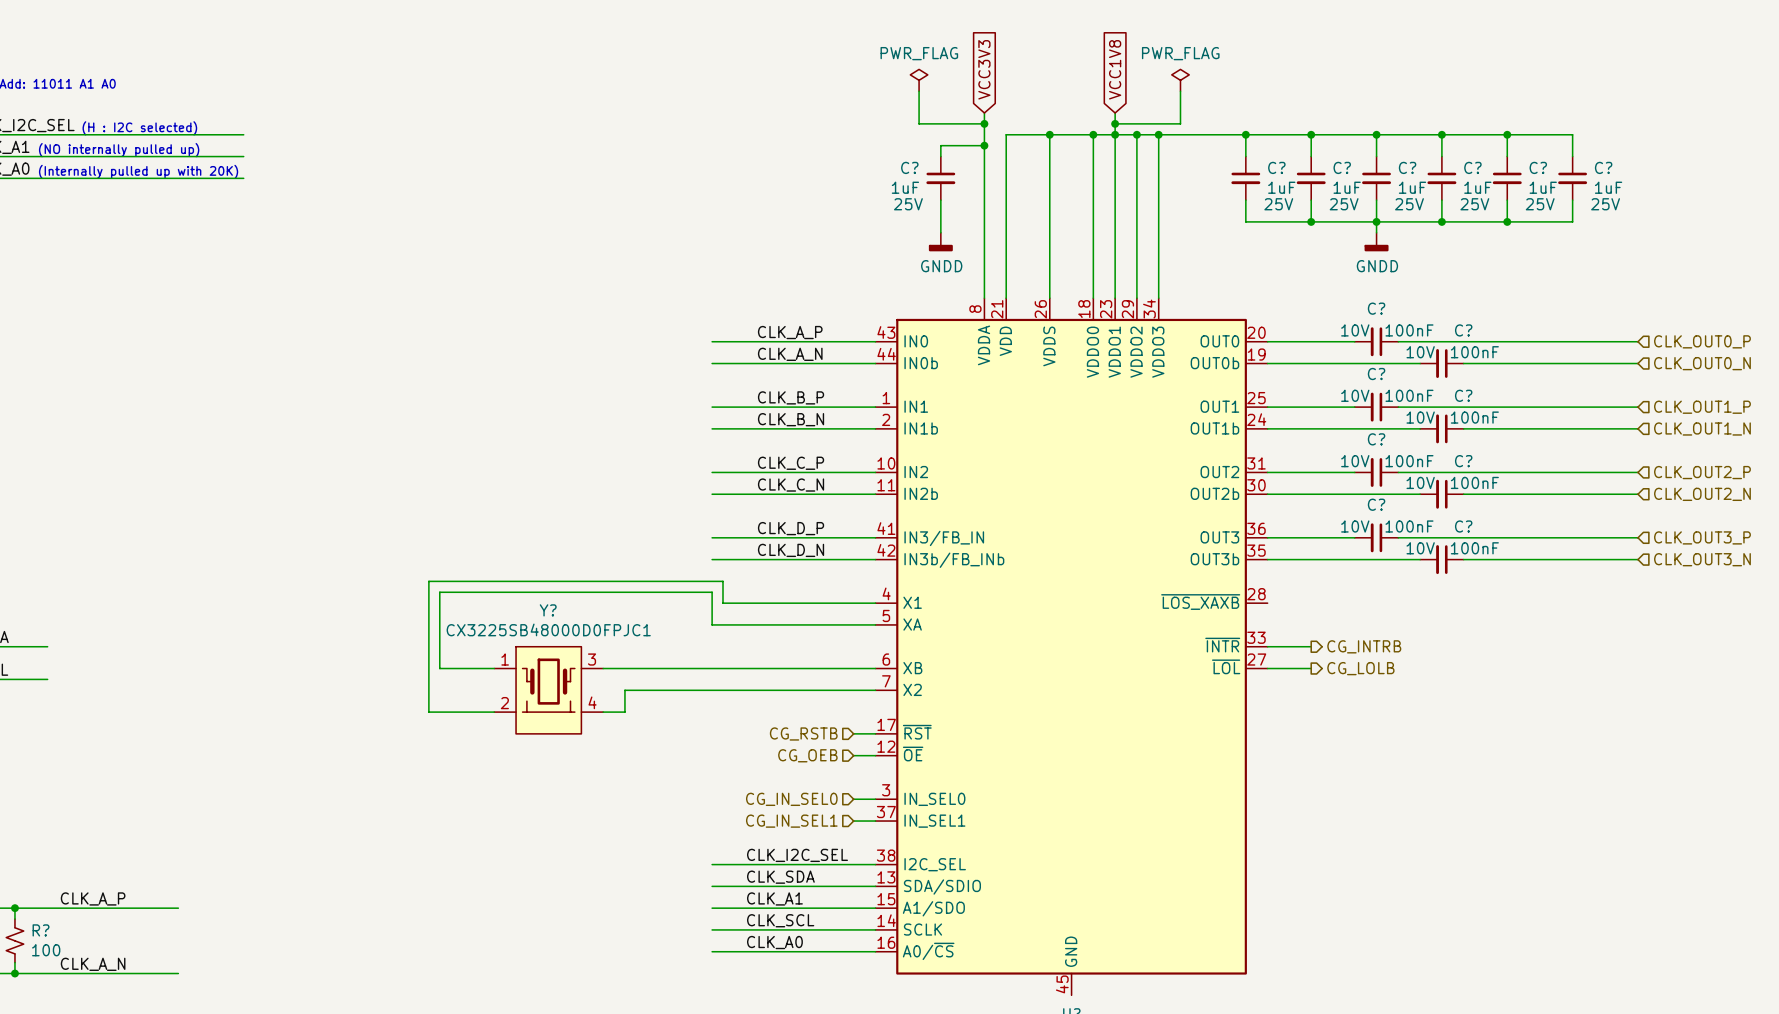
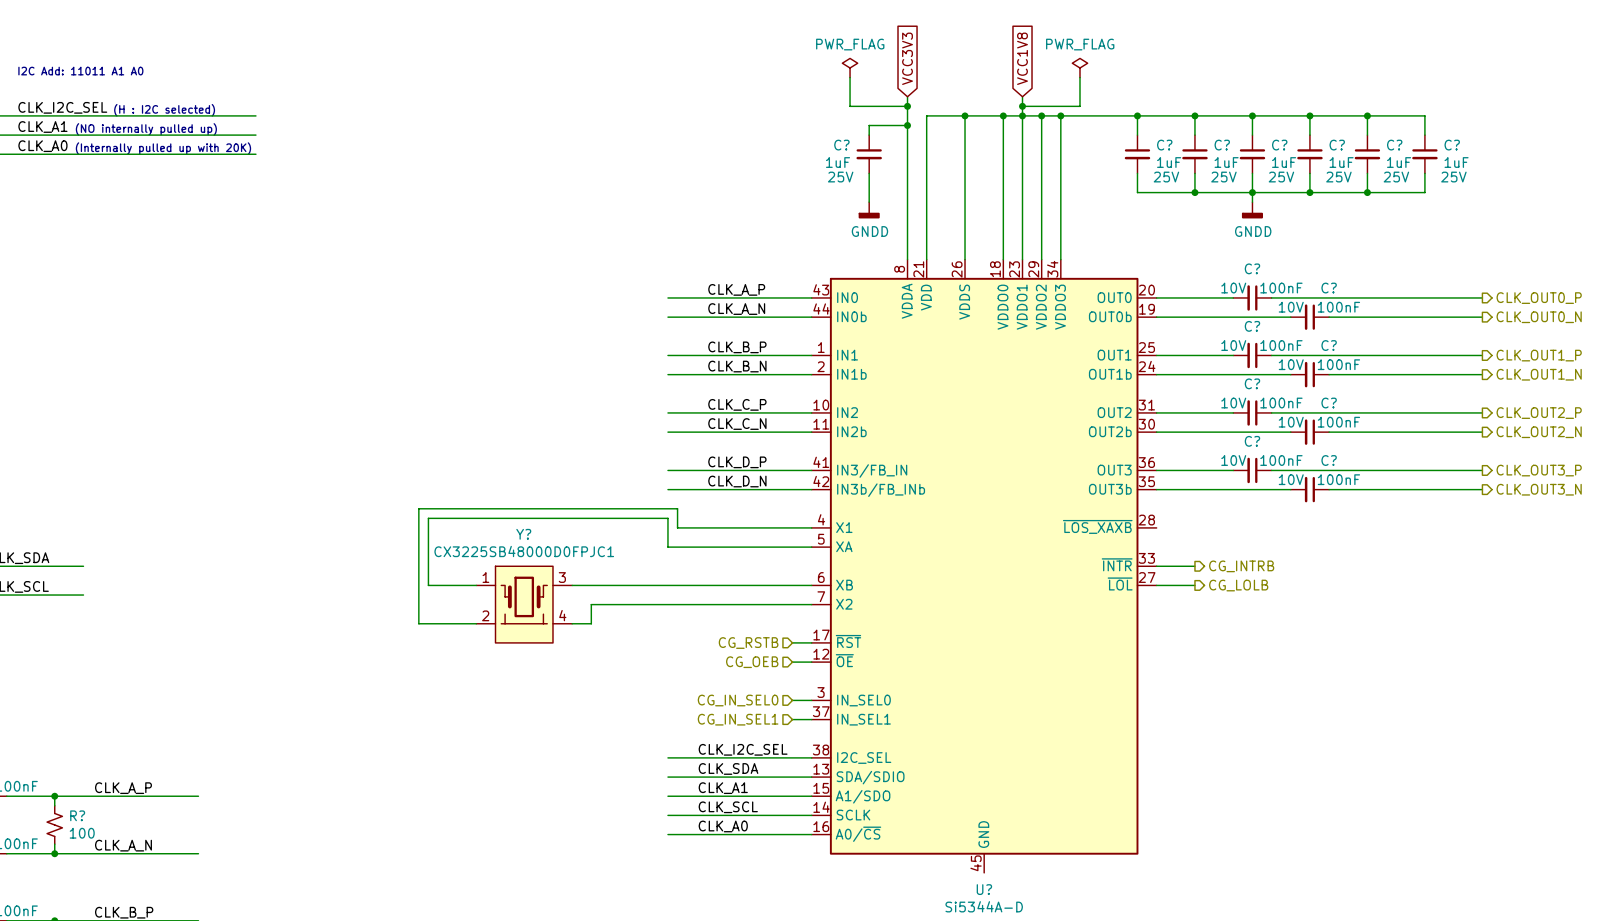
hierarchical label shape: input (1702, 341) -> output (1539, 298)
hierarchical label shape: input (1702, 363) -> output (1539, 317)
hierarchical label shape: input (1702, 407) -> output (1539, 355)
hierarchical label shape: input (1702, 428) -> output (1539, 374)
hierarchical label shape: input (1702, 472) -> output (1539, 413)
hierarchical label shape: input (1702, 494) -> output (1539, 432)
hierarchical label shape: input (1702, 537) -> output (1539, 470)
hierarchical label shape: input (1702, 559) -> output (1539, 489)

